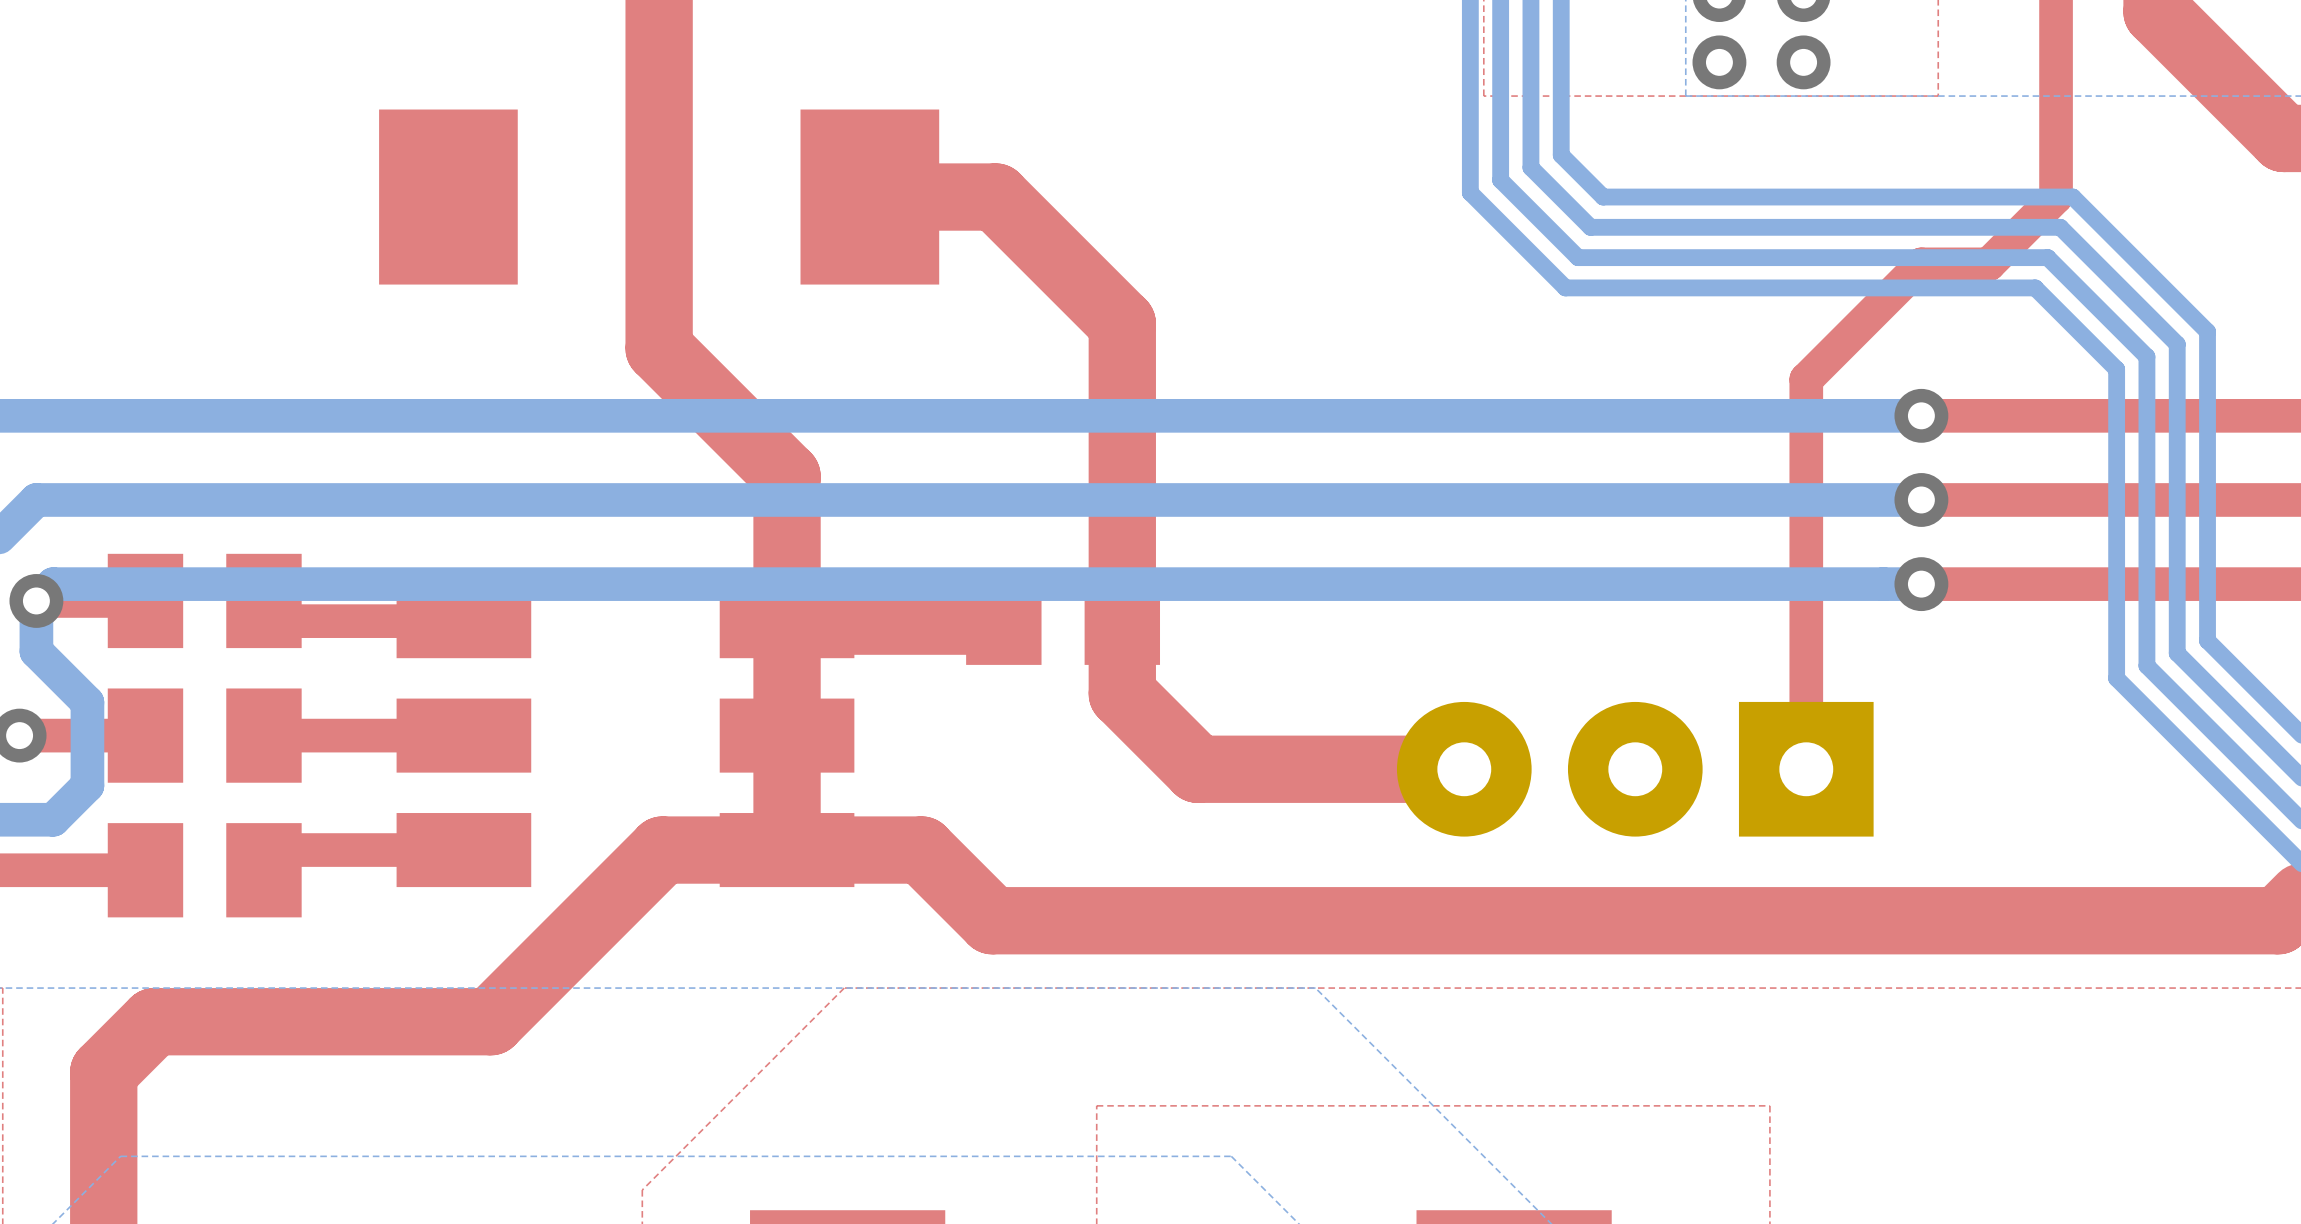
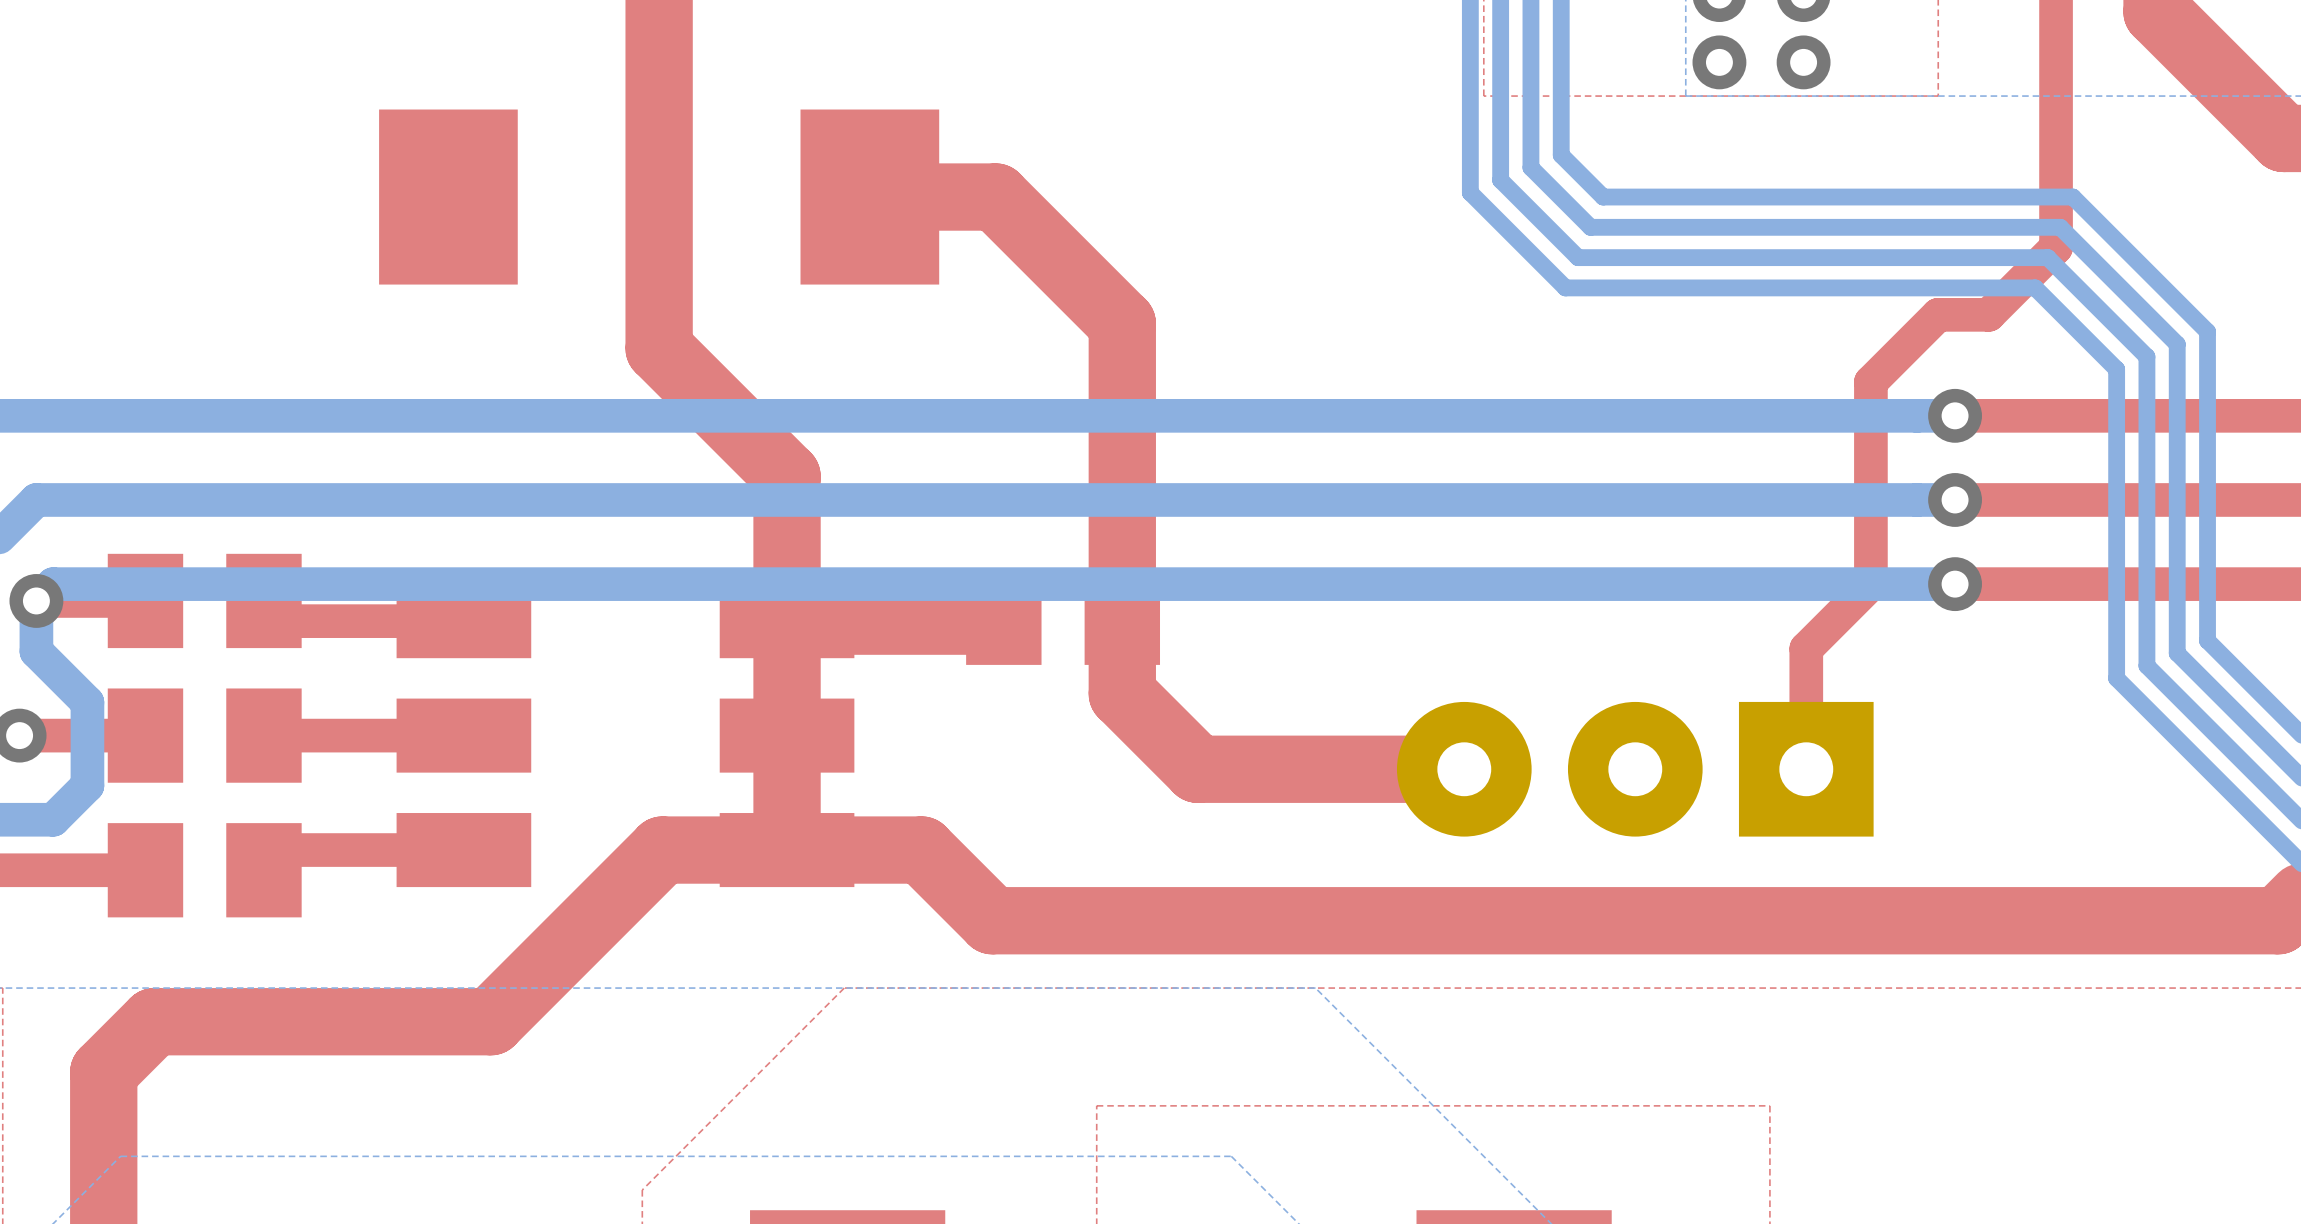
top track: (2056, 197) (1988, 264) (1921, 264) (1806, 379) (1806, 648) -> (2056, 197) (2056, 247) (1988, 314) (1938, 314) (1870, 382) (1870, 584) (1806, 648)
via position: (1921, 415) -> (1955, 415)
via position: (1921, 499) -> (1955, 499)
via position: (1921, 584) -> (1955, 584)

